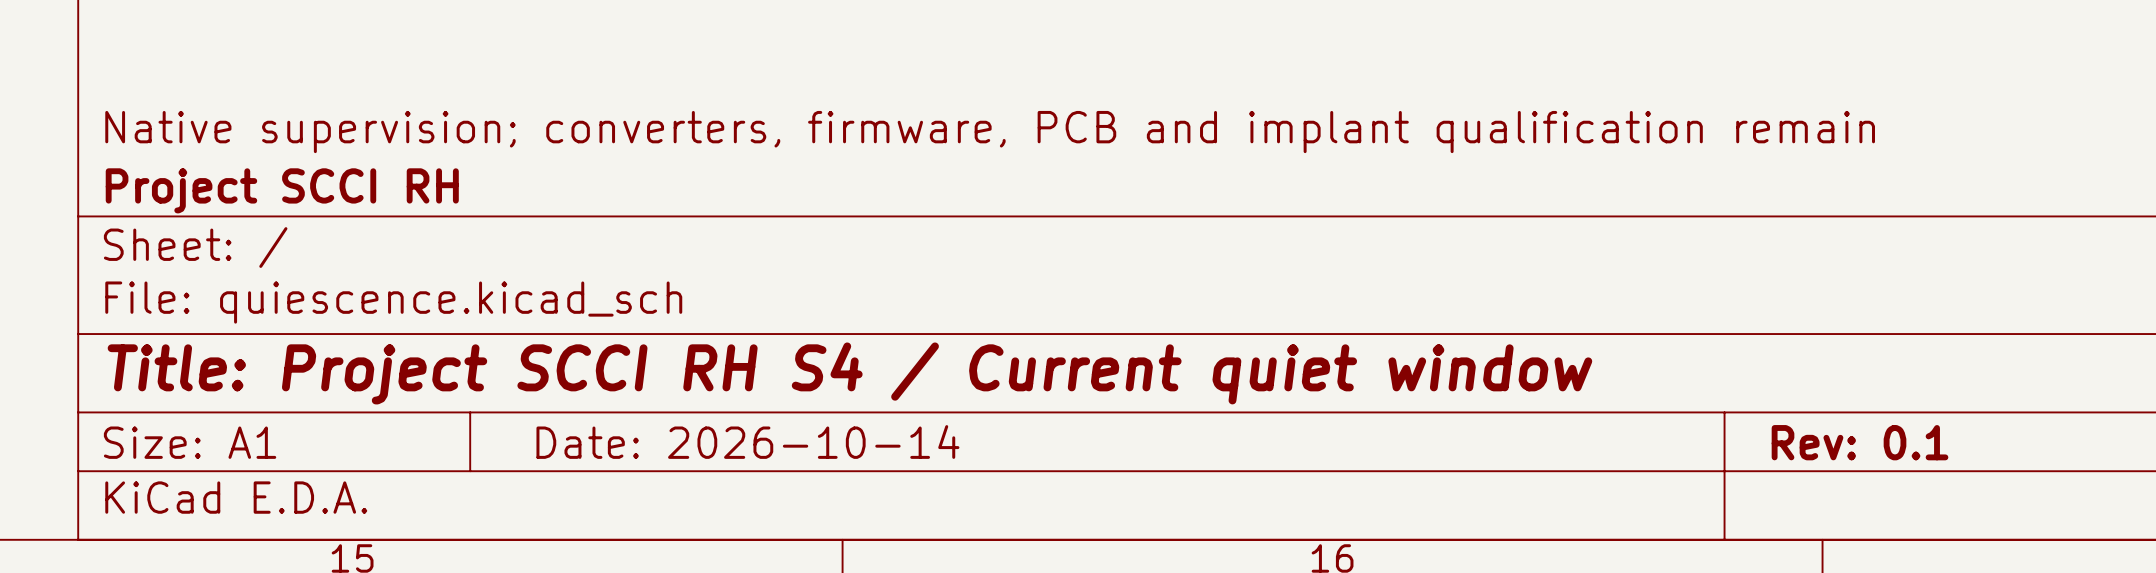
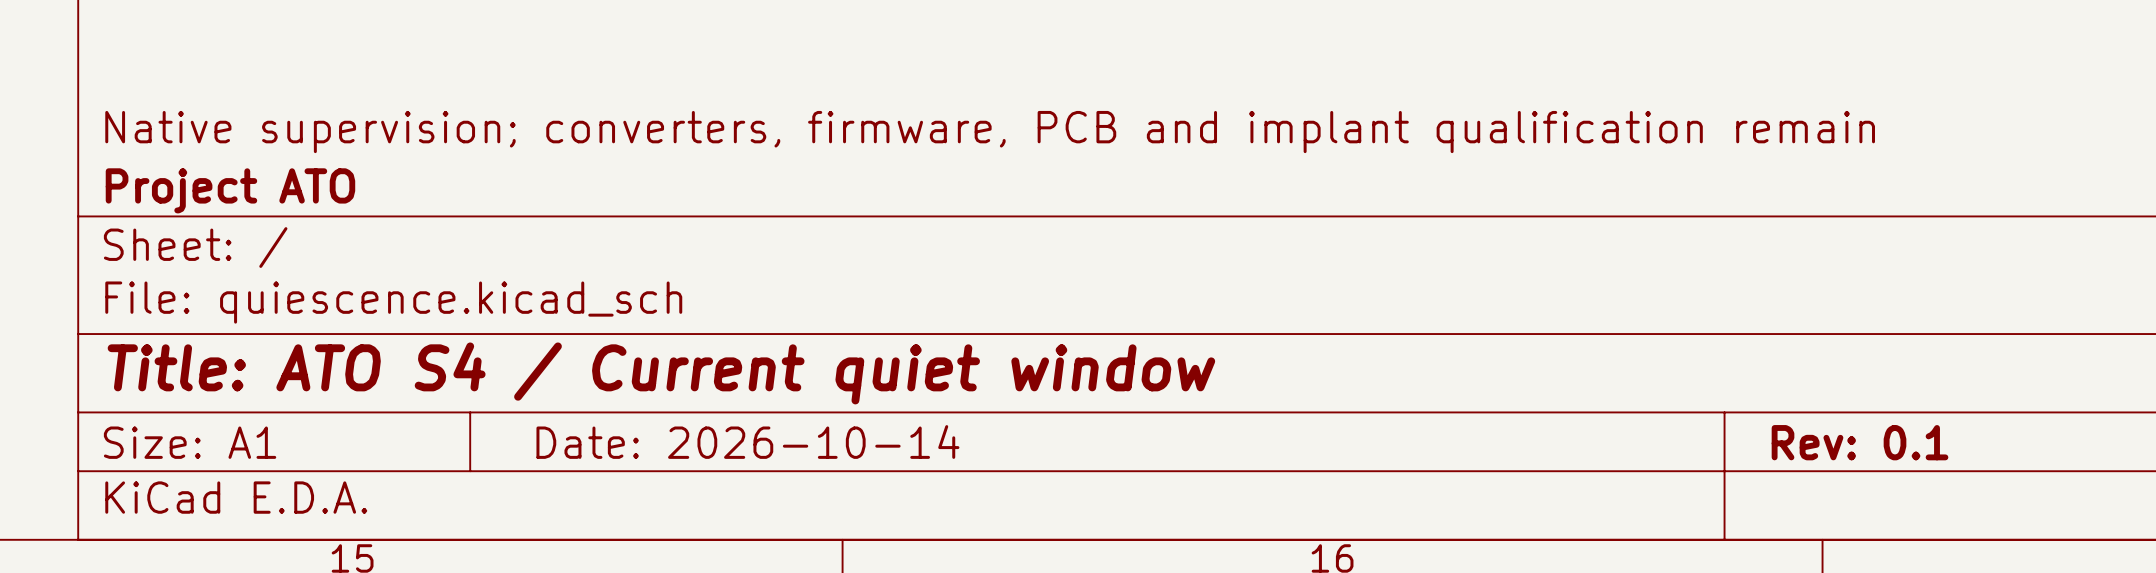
title block: Project SCCI RH (282, 190) -> Project ATO (230, 190)
title block: Title: Project SCCI RH S4 / Current quiet window (849, 373) -> Title: ATO S4 / Current quiet window (661, 373)

